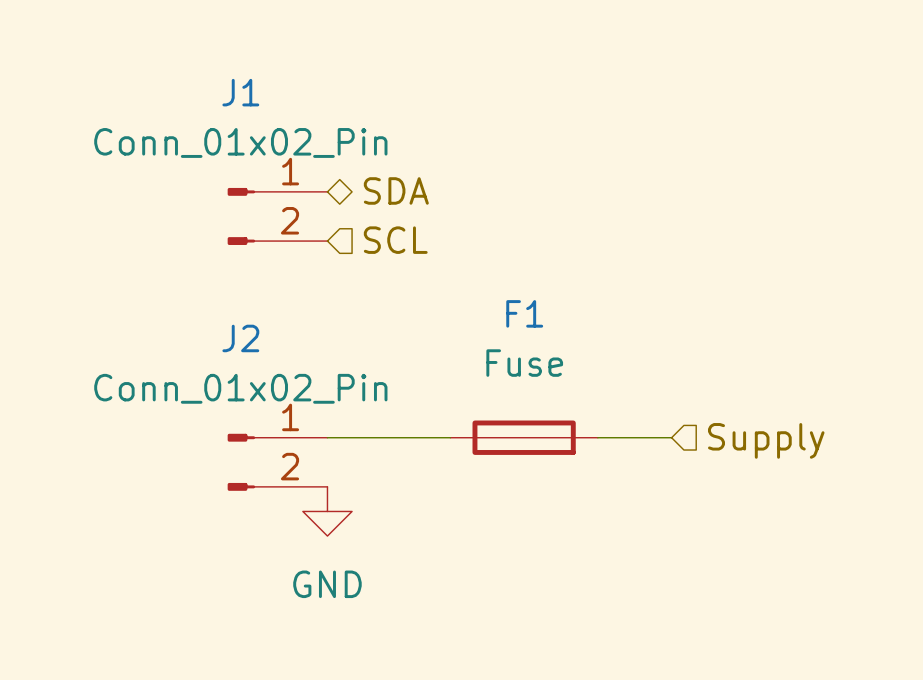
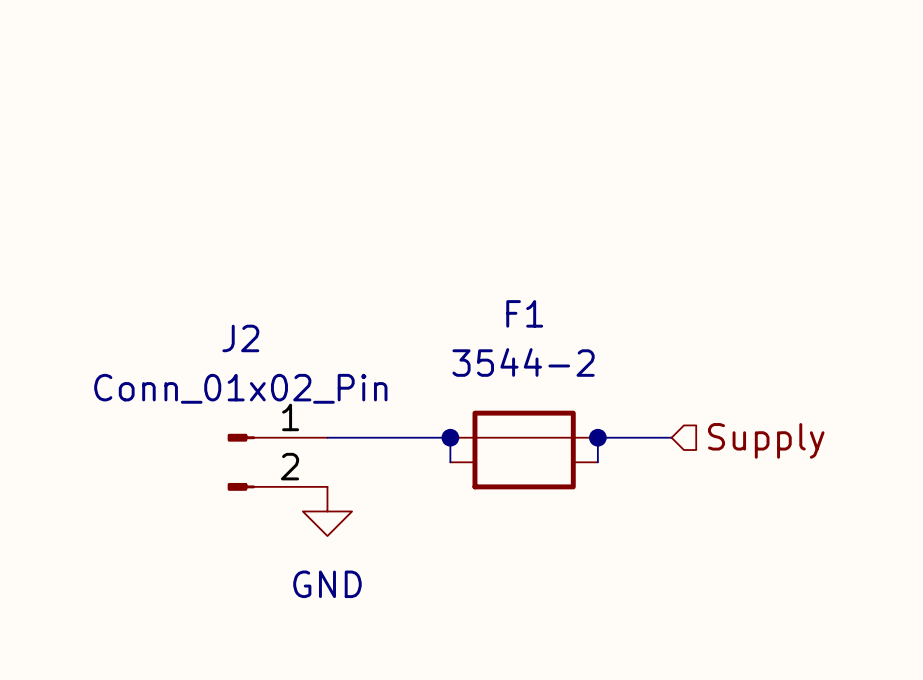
hierarchical label: SDA (396, 190) -> none
J1: Conn_01x02_Pin (277, 216) -> none
hierarchical label: SCL (395, 240) -> none
F1 value: Fuse (524, 363) -> 3544-2 (523, 362)
F1 symbol: [450, 420, 598, 455] -> [450, 410, 598, 490]
wire: none -> (450, 437) (450, 462)
junction: none -> (450, 437)
wire: none -> (597, 437) (597, 462)
junction: none -> (597, 437)

